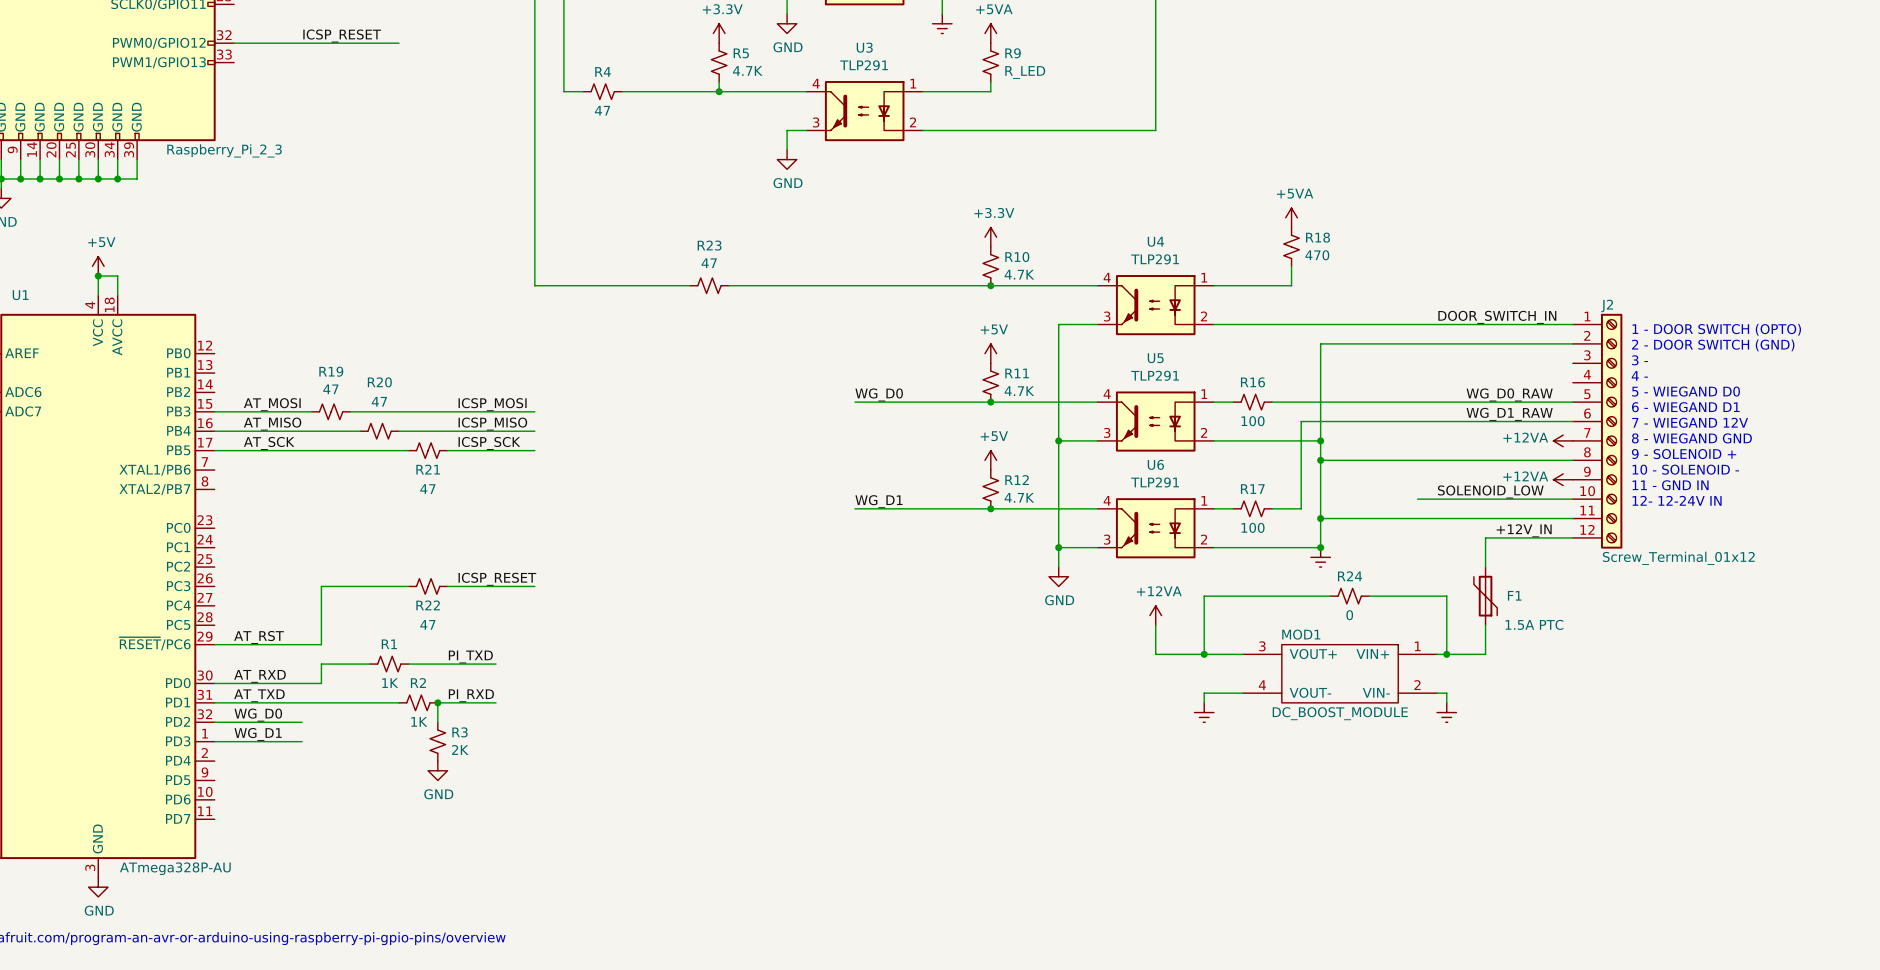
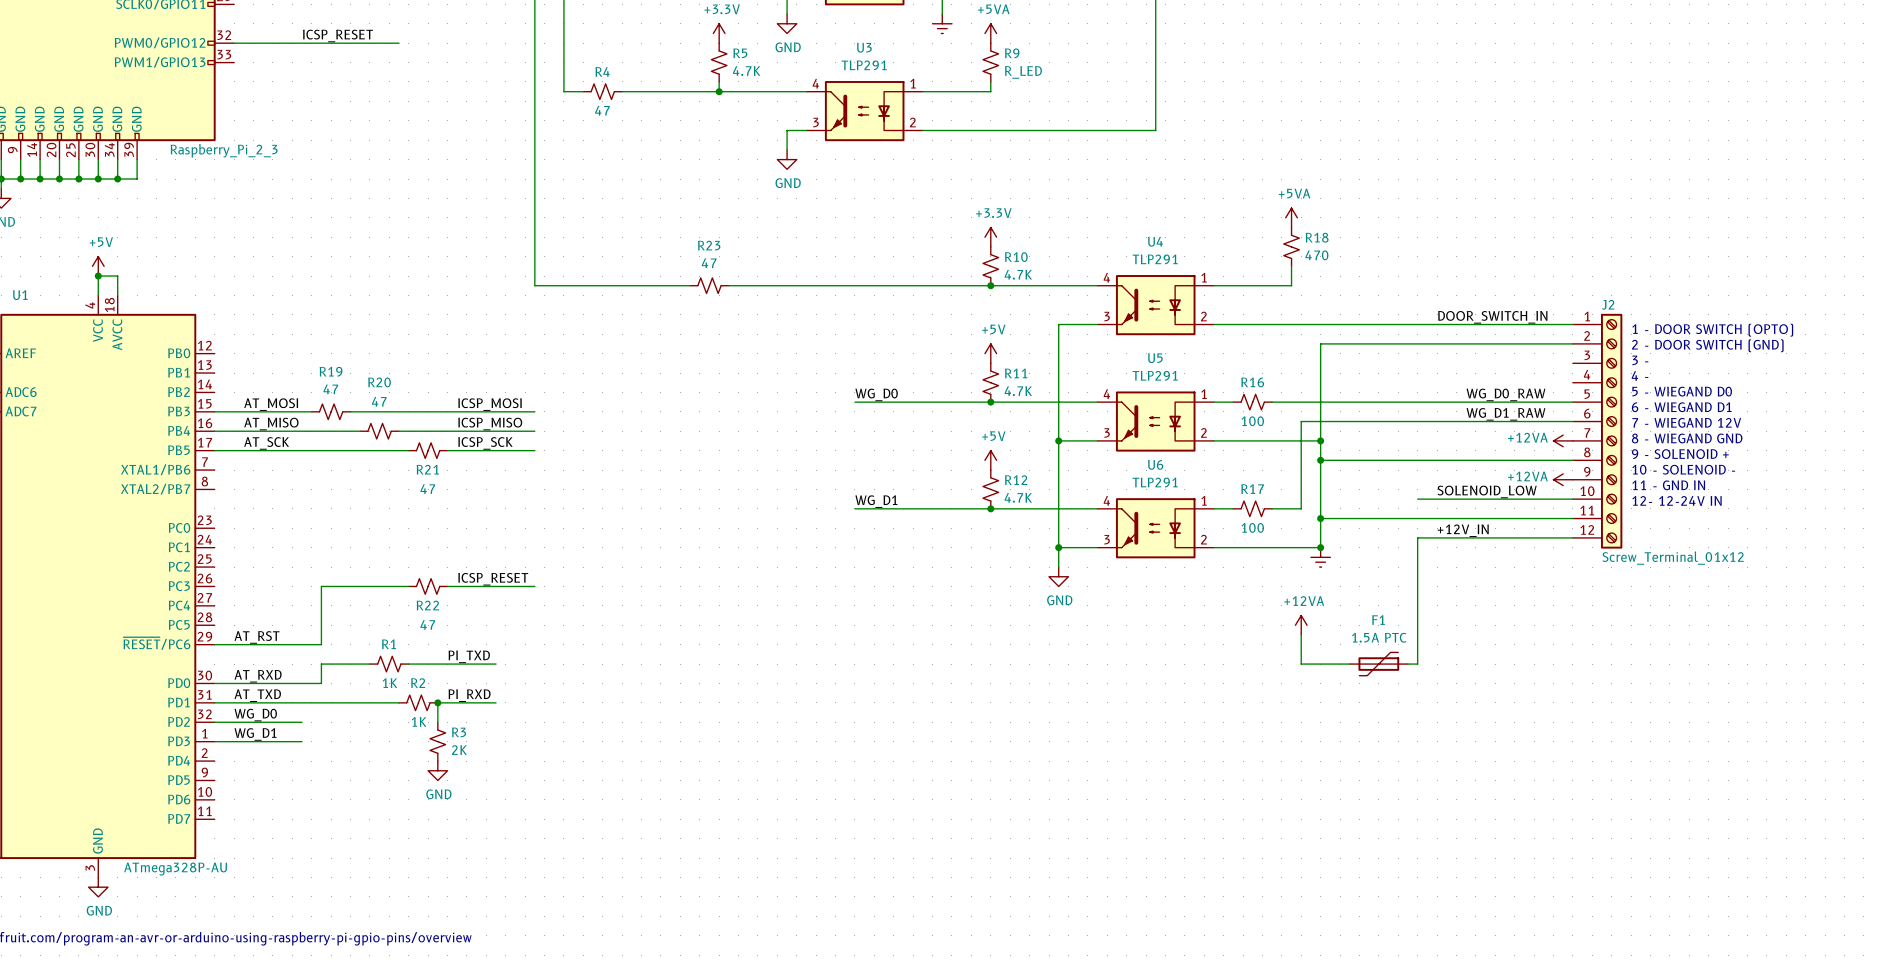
label position: +12V_IN (1524, 530) -> +12V_IN (1463, 530)
wire: (1485, 537) (1485, 567) -> (1485, 537) (1417, 537) (1417, 664) (1407, 664)
F1 name position: F1 (1514, 595) -> F1 (1378, 620)
wire: (1330, 596) (1204, 596) (1204, 654) -> none
R24: 0 (1349, 596) -> none
wire: (1369, 596) (1446, 596) (1446, 654) -> none
F1 rotation: 0° (1485, 596) -> 90° clockwise (1378, 664)
F1 position: (1485, 596) -> (1378, 664)
power symbol position: +12VA (1155, 615) -> +12VA (1301, 625)
F1 value position: 1.5A PTC (1534, 624) -> 1.5A PTC (1379, 637)
wire: (1155, 625) (1155, 654) (1243, 654) -> none
wire: (1485, 625) (1485, 654) (1437, 654) -> none
wire: none -> (1301, 634) (1301, 664) (1349, 664)
junction: (1204, 654) -> none
junction: (1446, 654) -> none
MOD1: DC_BOOST_MODULE (1340, 673) -> none
wire: (1243, 693) (1204, 693) (1204, 702) -> none
wire: (1437, 693) (1446, 693) (1446, 702) -> none
power symbol: (1204, 712) -> none
power symbol: (1446, 712) -> none

